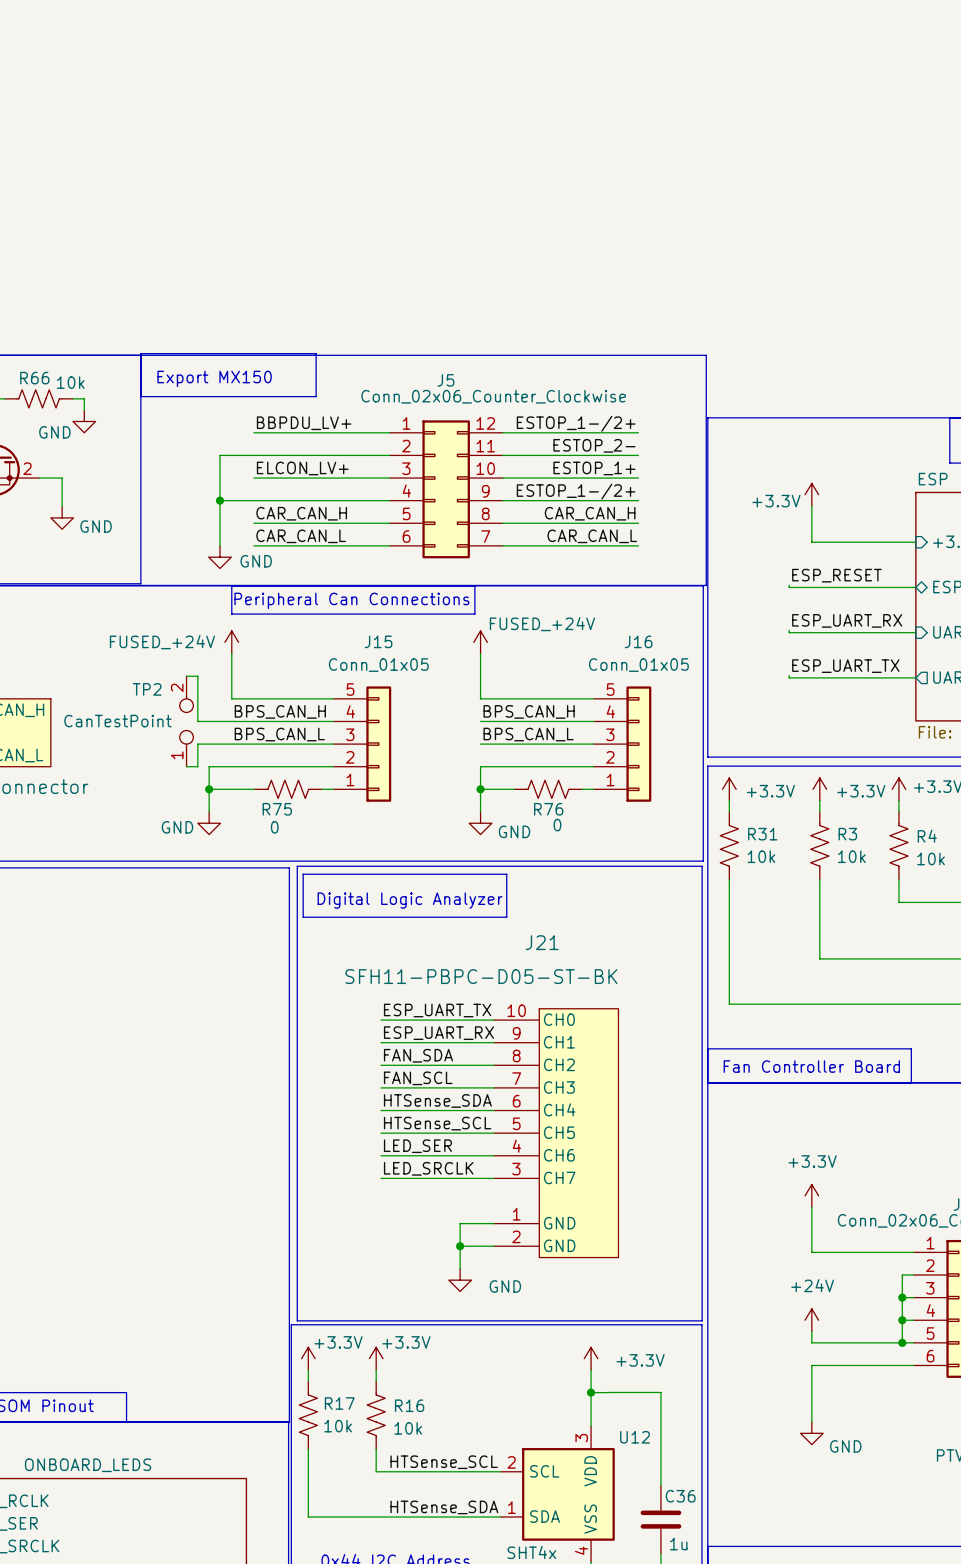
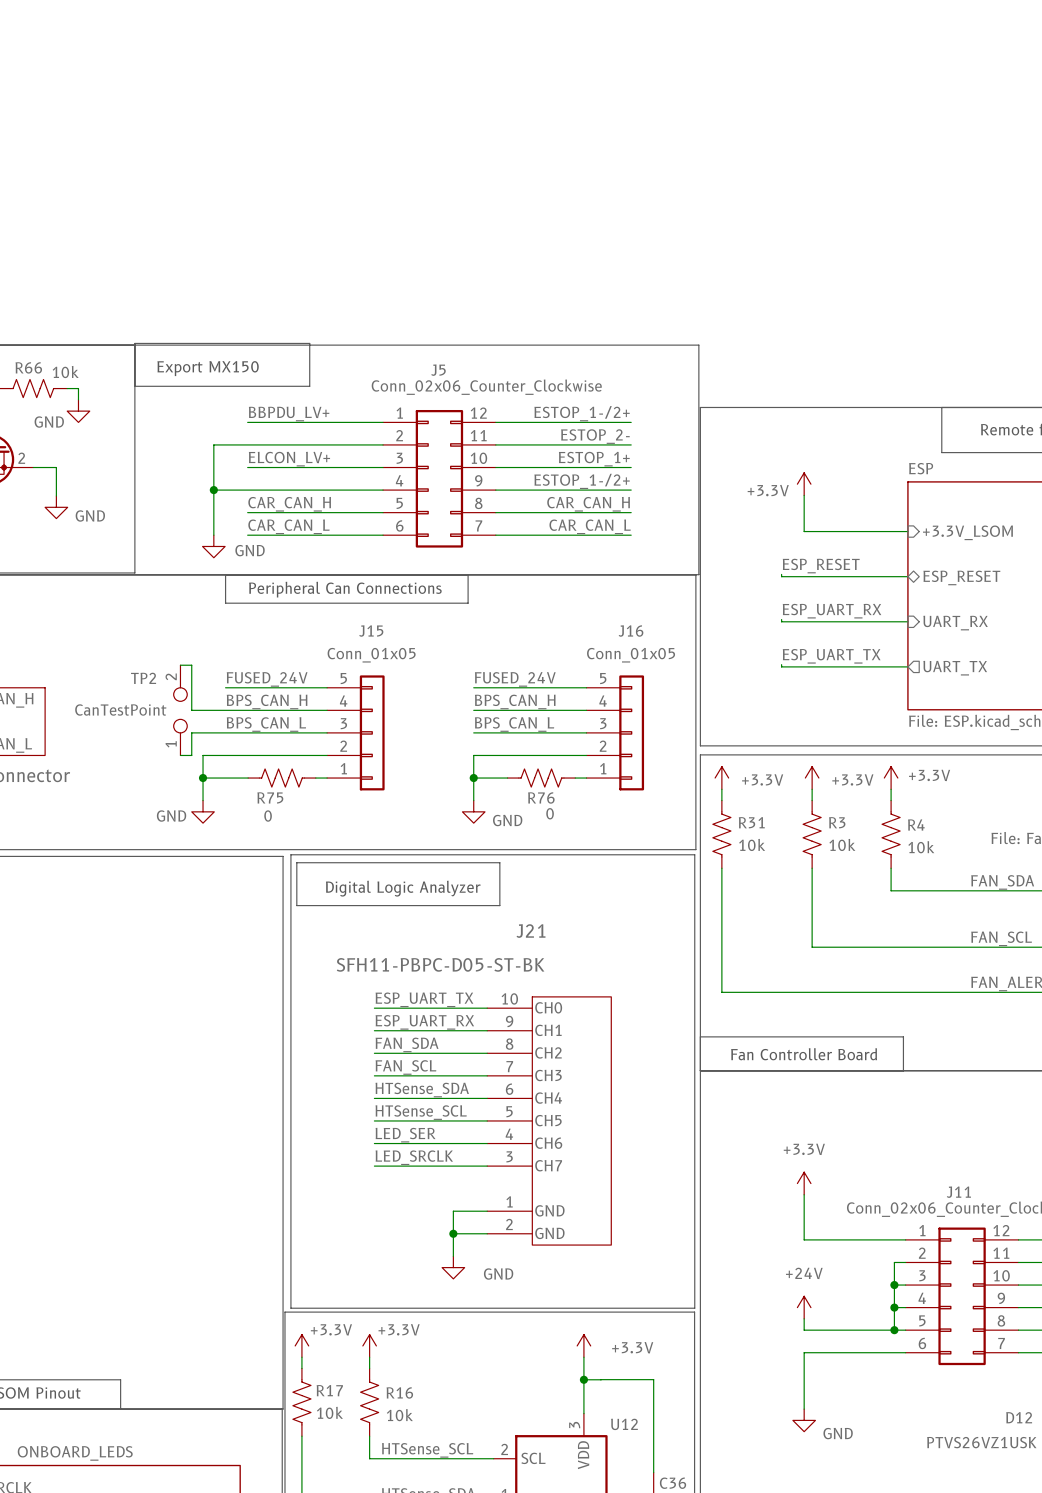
power symbol: FUSED_+24V (231, 642) -> none
power symbol: FUSED_+24V (480, 642) -> none
wire: (231, 653) (231, 698) -> none
wire: (480, 653) (480, 698) -> none
label: none -> FUSED_24V (267, 679)
label: none -> FUSED_24V (515, 679)

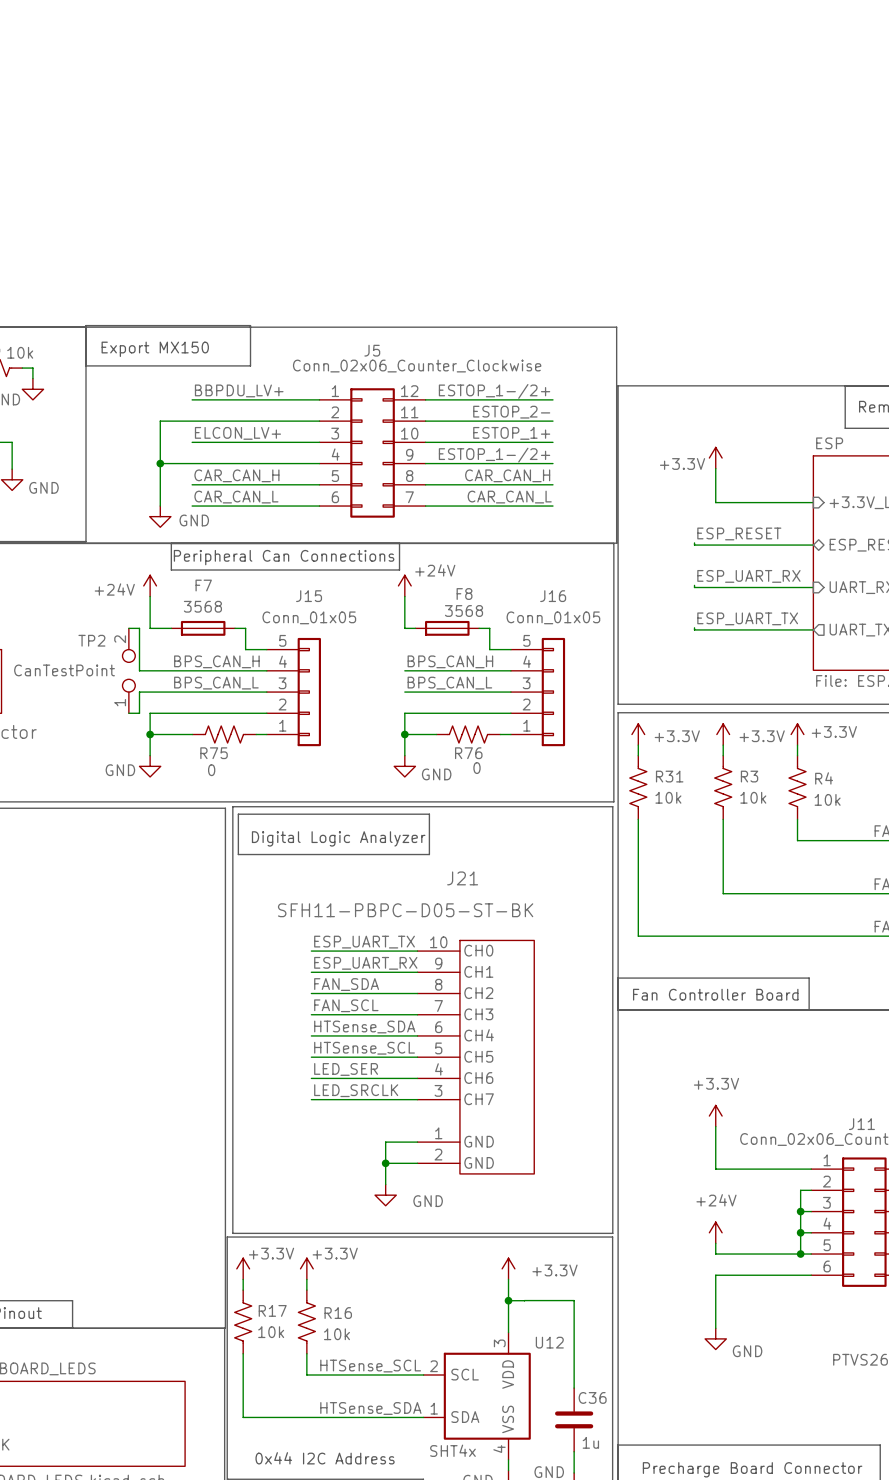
power symbol: none -> +24V (150, 585)
power symbol: none -> +24V (404, 585)
wire: none -> (150, 596) (150, 628) (171, 628)
wire: none -> (404, 596) (404, 628) (415, 628)
F7: none -> 3568 (203, 628)
F8: none -> 3568 (447, 628)
label: FUSED_24V (267, 679) -> none
label: FUSED_24V (515, 679) -> none
wire: (225, 687) (304, 687) -> (235, 628) (245, 628) (245, 649)
wire: (473, 687) (563, 687) -> (479, 628) (489, 628) (489, 649)

